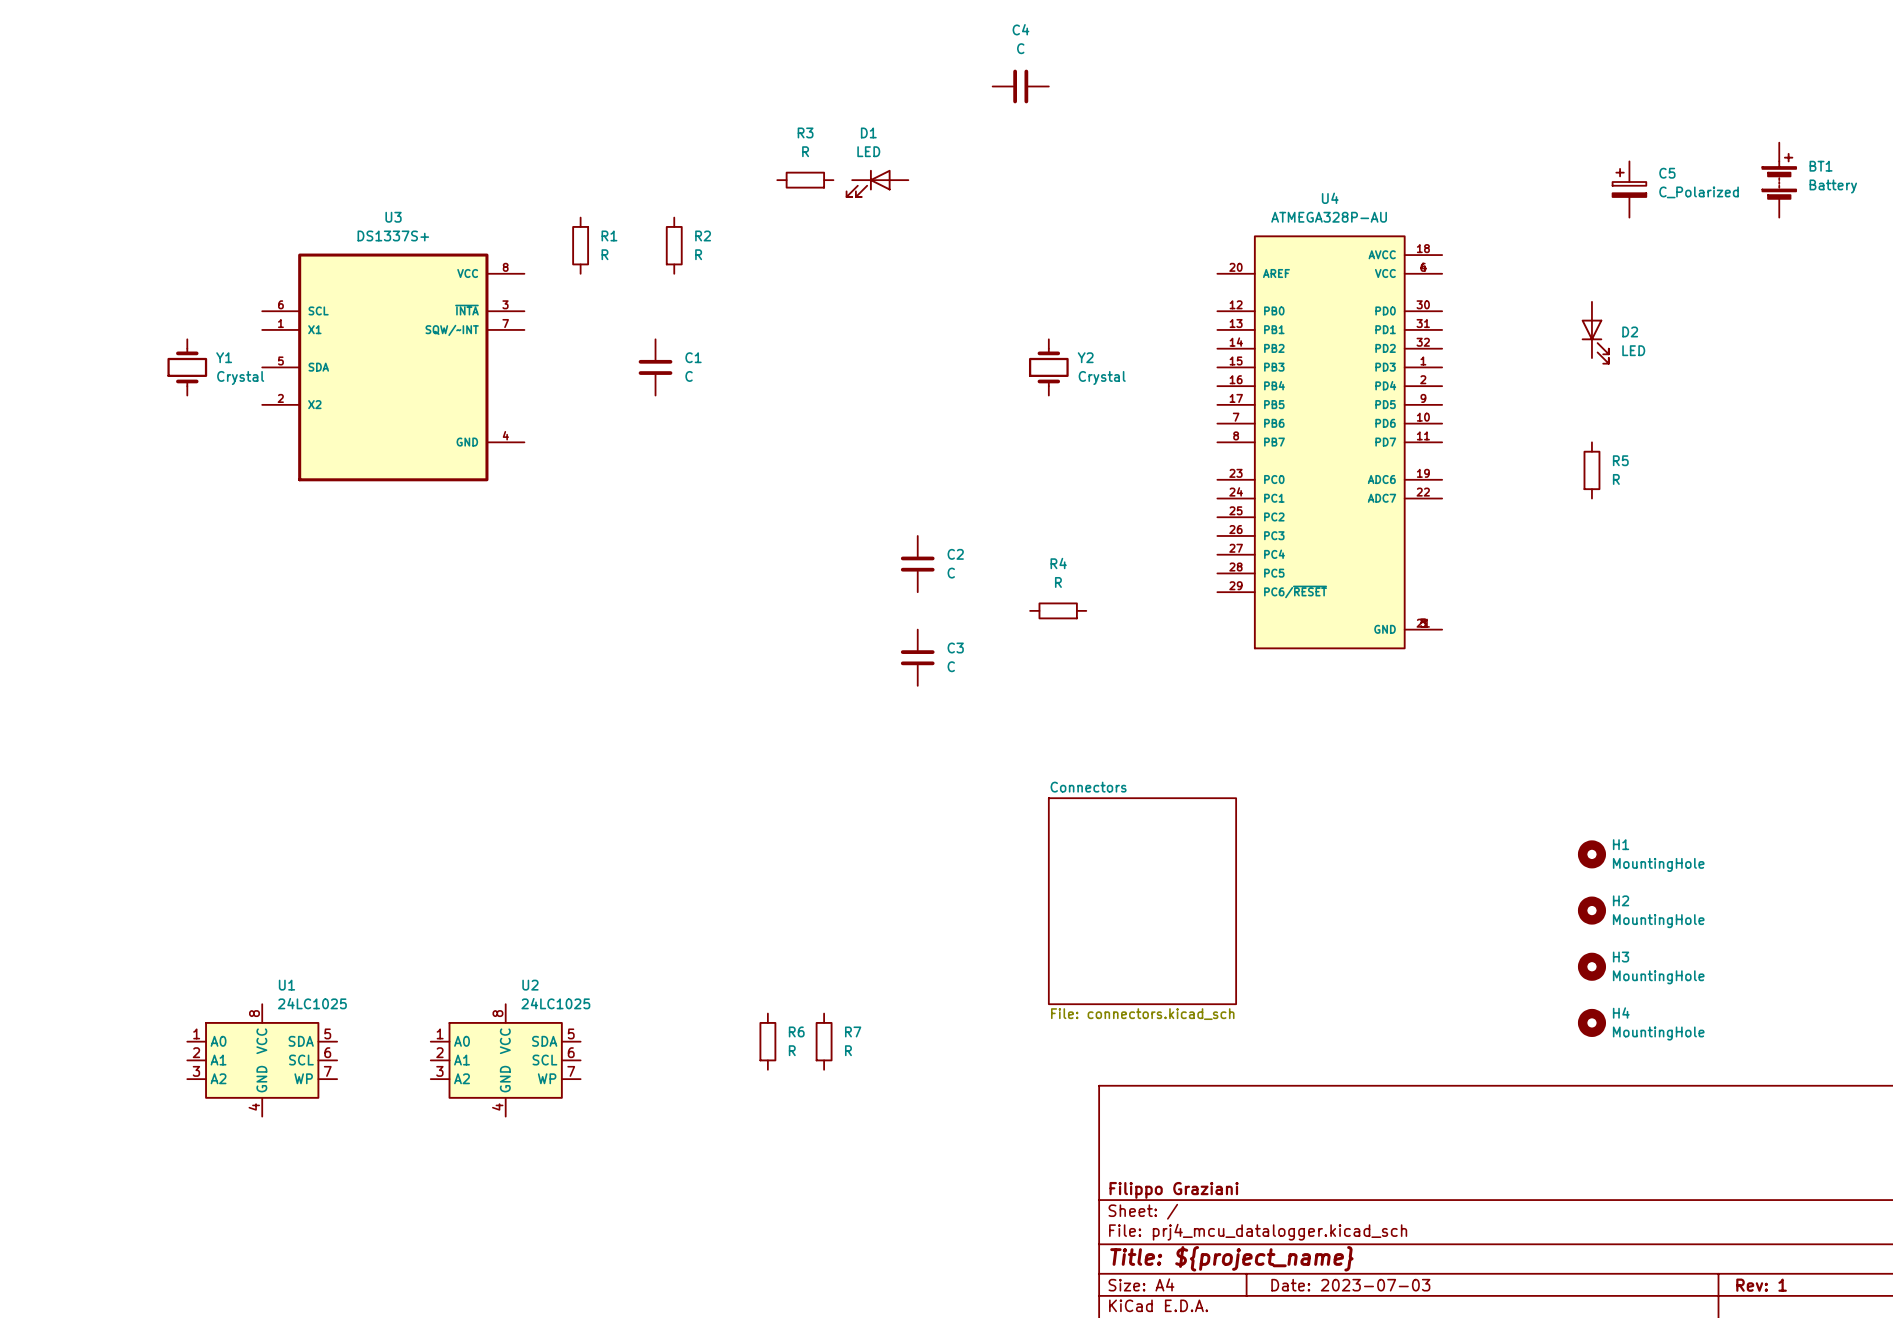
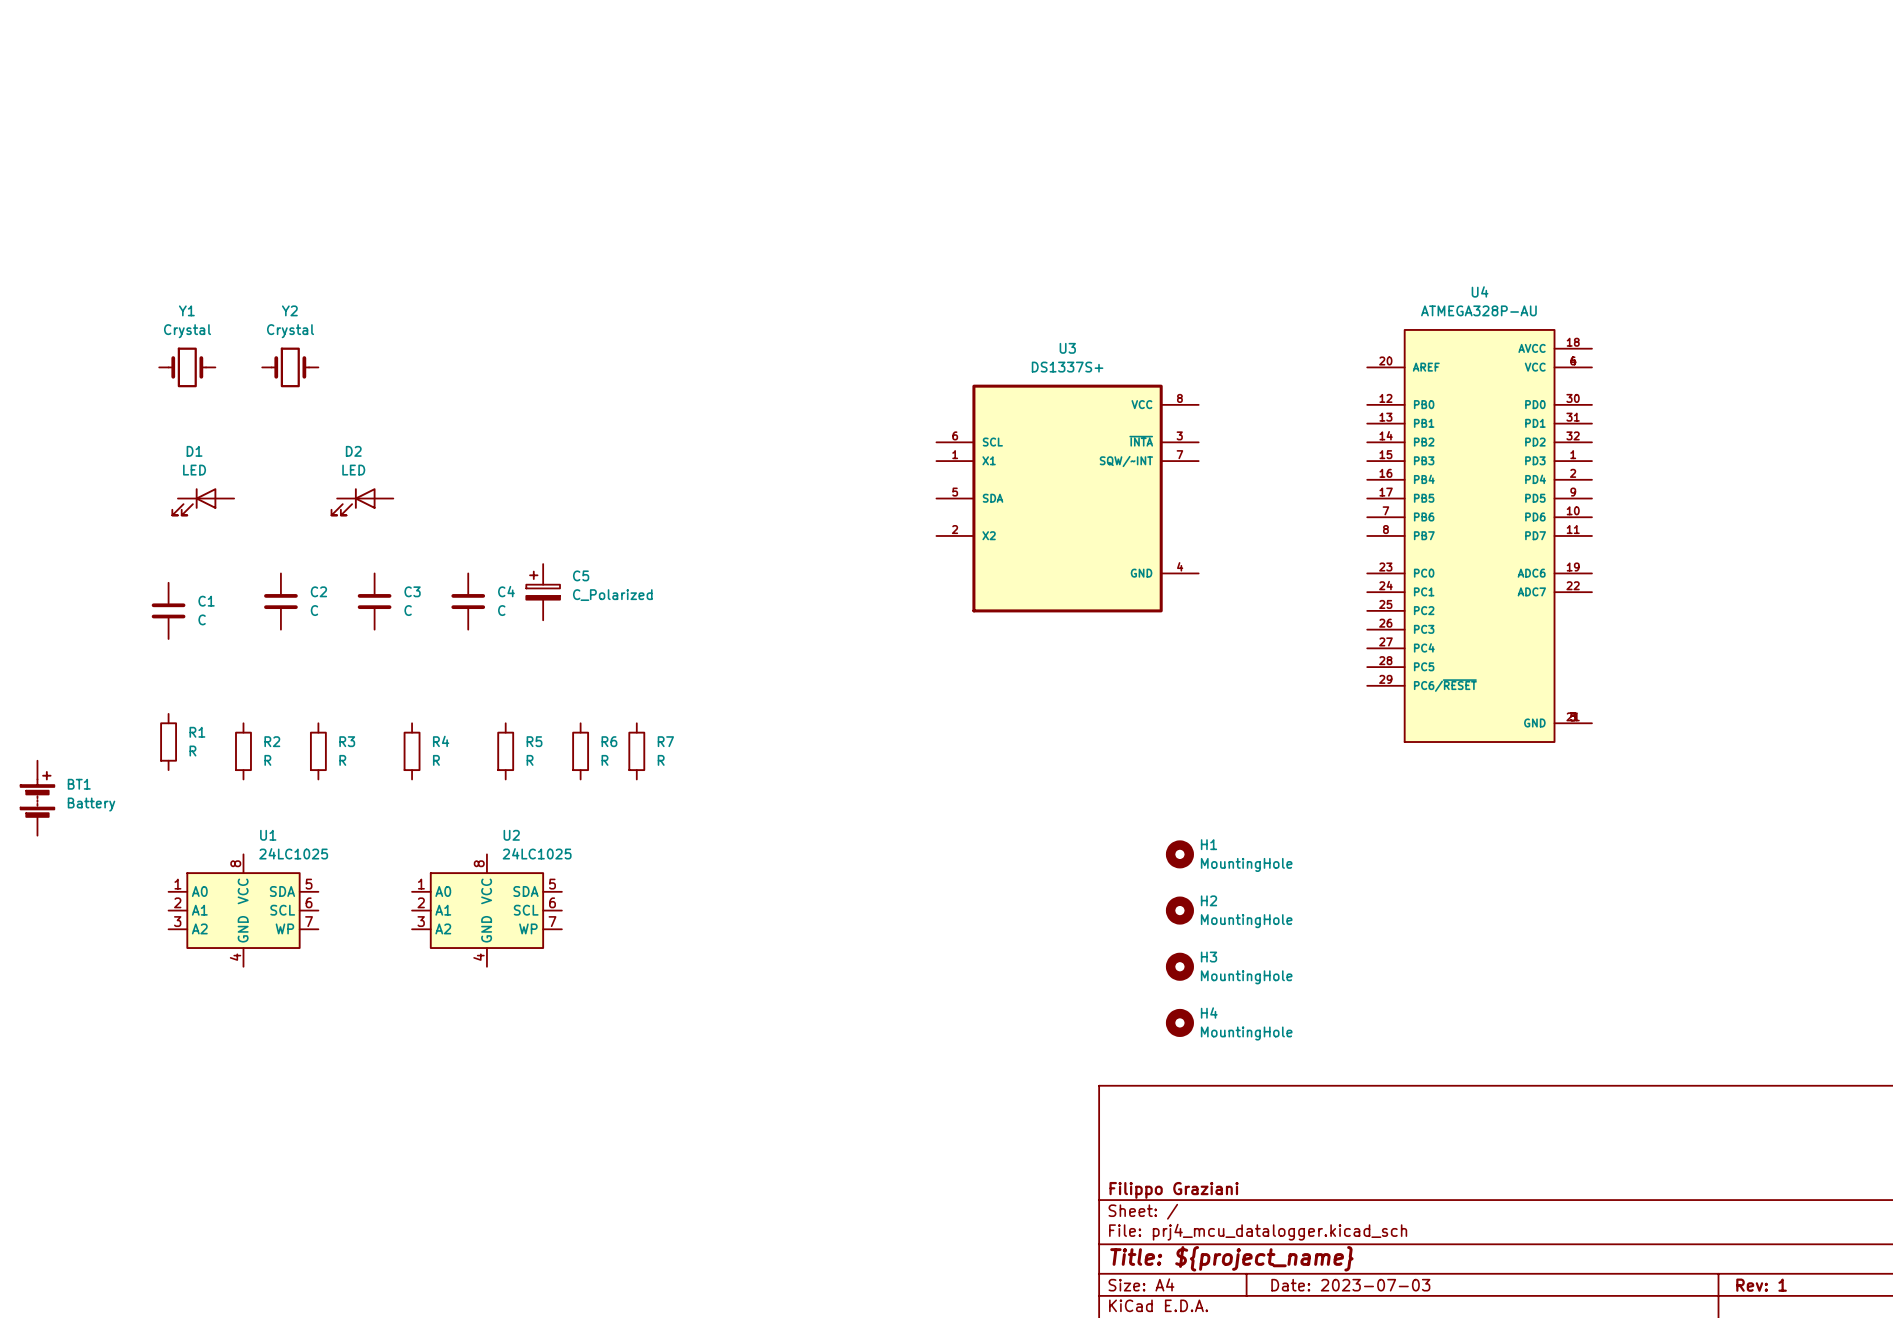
C4 name position: C4 (1020, 29) -> C4 (506, 591)
C4 rotation: 0° (1020, 86) -> 90° clockwise (468, 601)
C4 position: (1020, 86) -> (468, 601)
R3 name position: R3 (805, 132) -> R3 (347, 741)
R3 rotation: 0° (805, 180) -> 90° clockwise (318, 751)
R3 position: (805, 180) -> (318, 751)
BT1 position: (1779, 180) -> (37, 798)
D1 position: (877, 183) -> (203, 501)
C5 position: (1629, 189) -> (543, 592)
R1 position: (580, 245) -> (168, 742)
R2 position: (674, 245) -> (243, 751)
D2 name position: D2 (1630, 331) -> D2 (353, 451)
D2 position: (1595, 332) -> (362, 501)
D2 rotation: 0° (1595, 341) -> 90° clockwise (353, 501)
D2 value position: LED (1633, 350) -> LED (353, 470)
Y1 name position: Y1 (224, 357) -> Y1 (186, 310)
Y2 name position: Y2 (1085, 357) -> Y2 (289, 310)
Y1 rotation: 0° (187, 367) -> 90° clockwise (187, 367)
U3 position: (393, 367) -> (1067, 498)
C1 position: (655, 367) -> (168, 610)
Y2 rotation: 0° (1048, 367) -> 90° clockwise (290, 367)
Y2 position: (1048, 367) -> (290, 367)
Y1 value position: Crystal (240, 378) -> Crystal (187, 331)
Y2 value position: Crystal (1102, 378) -> Crystal (290, 331)
U4 position: (1329, 442) -> (1479, 535)
R5 position: (1591, 470) -> (505, 751)
R4 name position: R4 (1058, 563) -> R4 (441, 741)
C2 position: (917, 564) -> (280, 601)
R4 rotation: 0° (1058, 610) -> 90° clockwise (412, 751)
R4 position: (1058, 610) -> (412, 751)
C3 position: (917, 657) -> (374, 601)
H1 position: (1591, 854) -> (1179, 854)
sheet Connectors: File: connectors.kicad_sch (1142, 901) -> none
H2 position: (1591, 910) -> (1179, 910)
H3 position: (1591, 966) -> (1179, 966)
H4 position: (1591, 1022) -> (1179, 1022)
R6 position: (767, 1041) -> (580, 751)
R7 position: (824, 1041) -> (636, 751)
U1 position: (262, 1060) -> (243, 910)
U2 position: (505, 1060) -> (486, 910)

